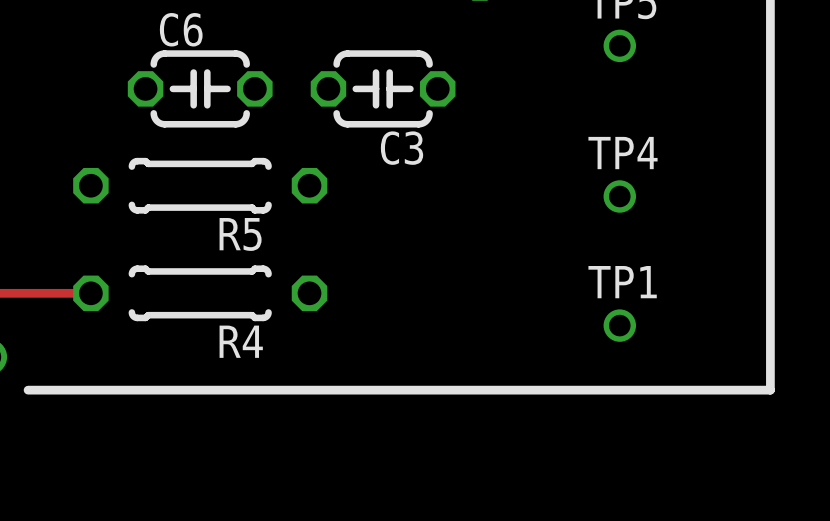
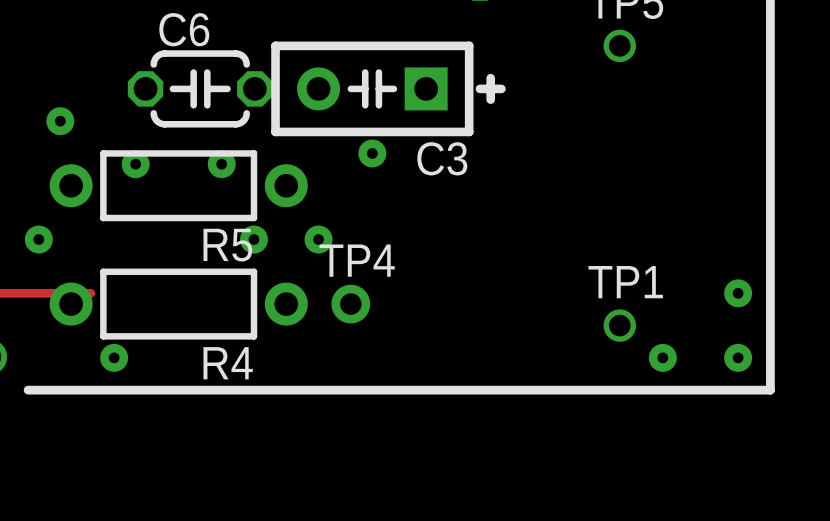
C3 footprint: [310, 50, 456, 128] -> [271, 41, 506, 137]
via: none -> (60, 121)
via: none -> (372, 153)
R5 footprint: [73, 157, 328, 214] -> [49, 150, 308, 222]
via: none -> (135, 164)
via: none -> (221, 164)
TP4 footprint: [603, 180, 637, 213] -> [331, 284, 371, 324]
via: none -> (38, 239)
via: none -> (254, 239)
via: none -> (318, 239)
R4 footprint: [73, 265, 328, 322] -> [49, 268, 308, 340]
via: none -> (738, 293)
via: none -> (114, 357)
via: none -> (662, 357)
via: none -> (738, 357)

